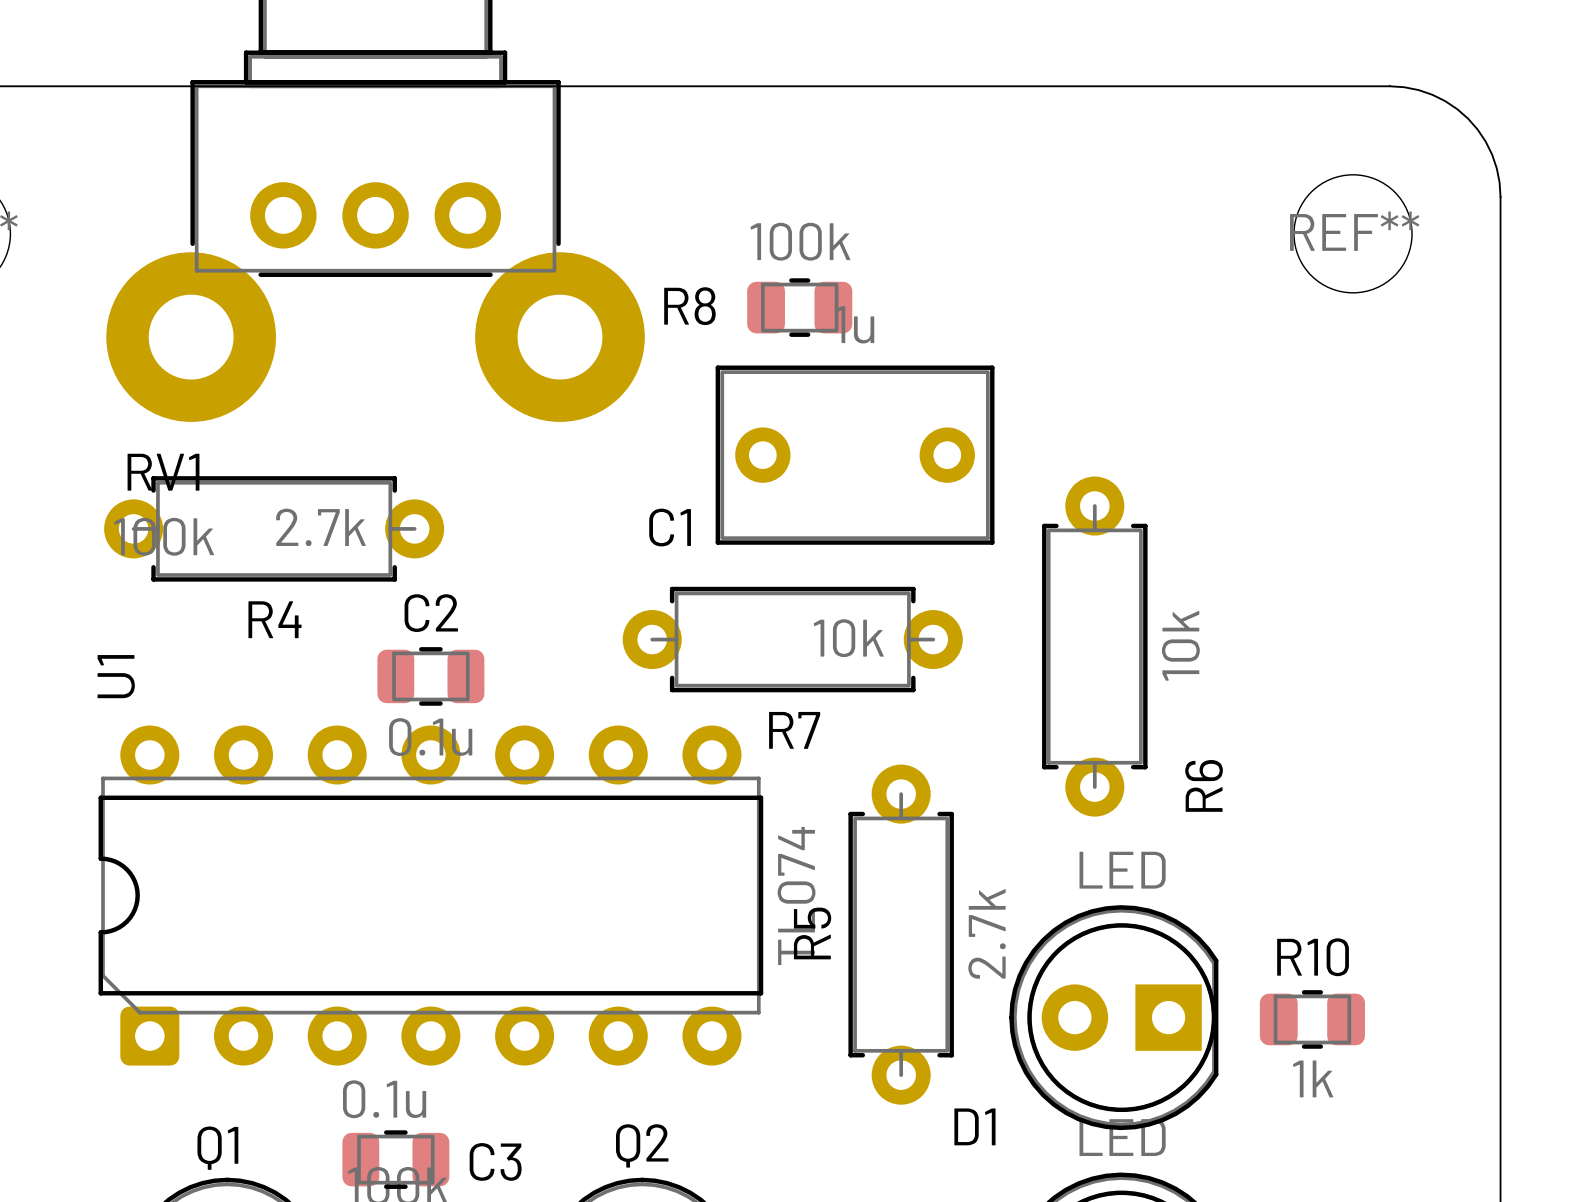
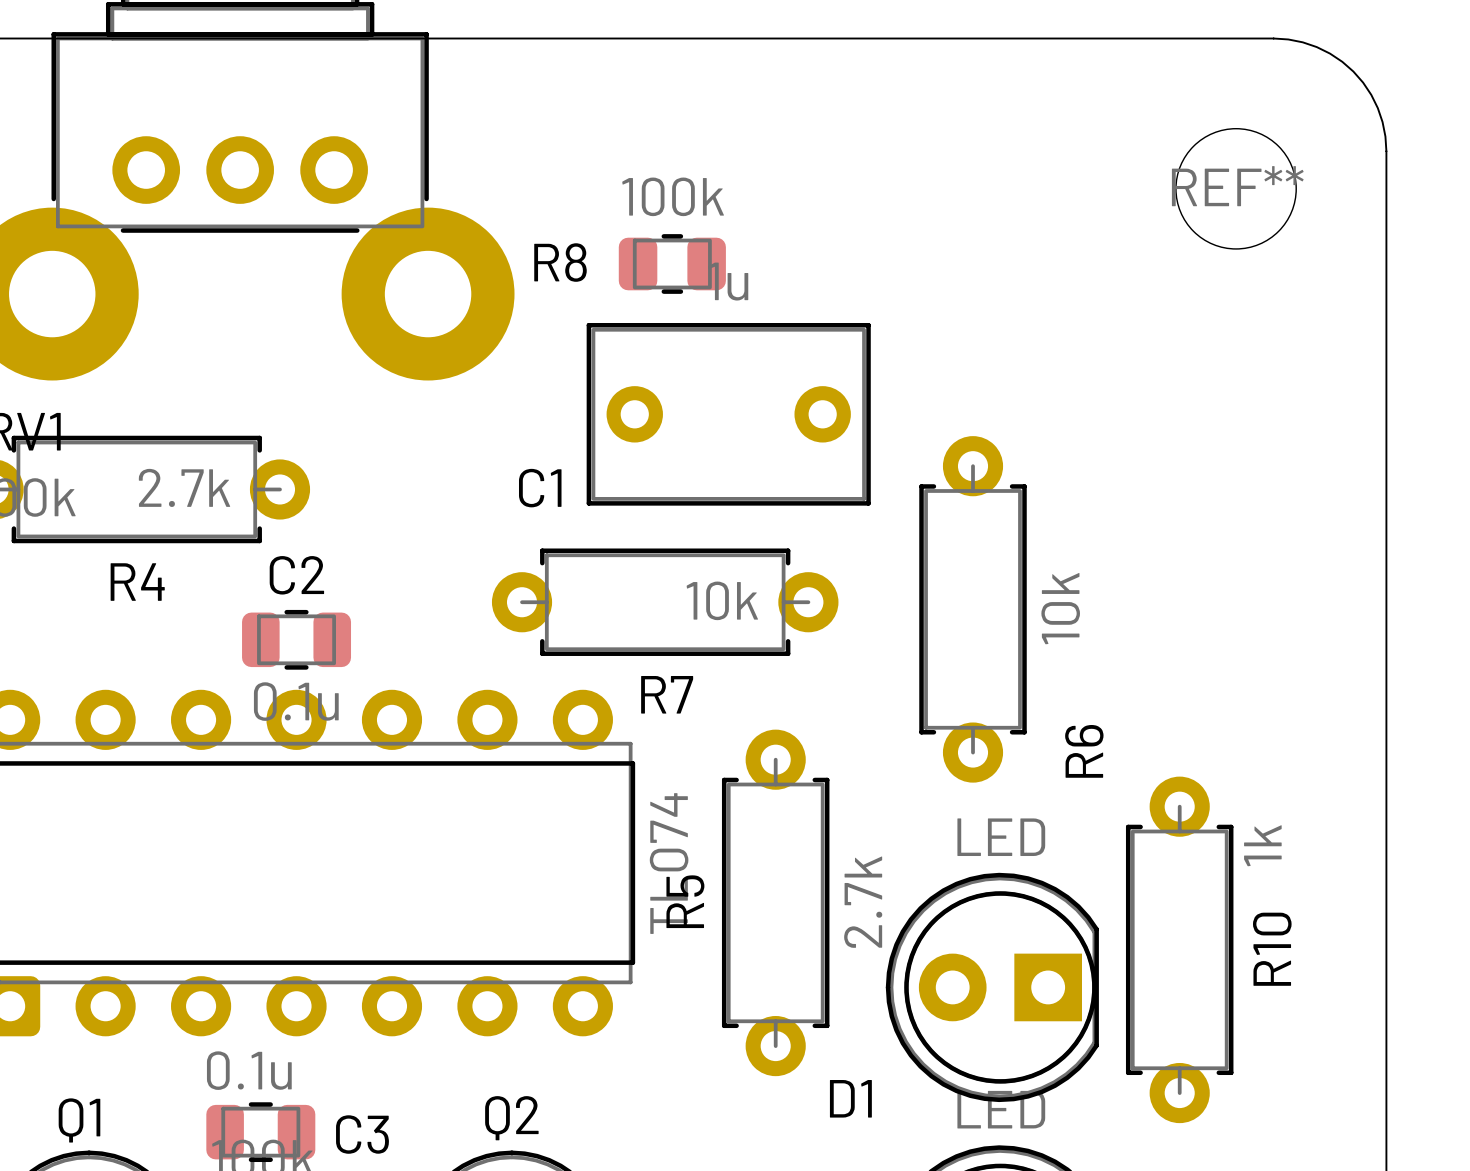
R10 name position: R10 (1313, 957) -> R10 (1272, 949)
R10 footprint: [1259, 990, 1365, 1049] -> [1125, 776, 1234, 1124]
R10 value position: 1k (1313, 1078) -> 1k (1262, 845)

